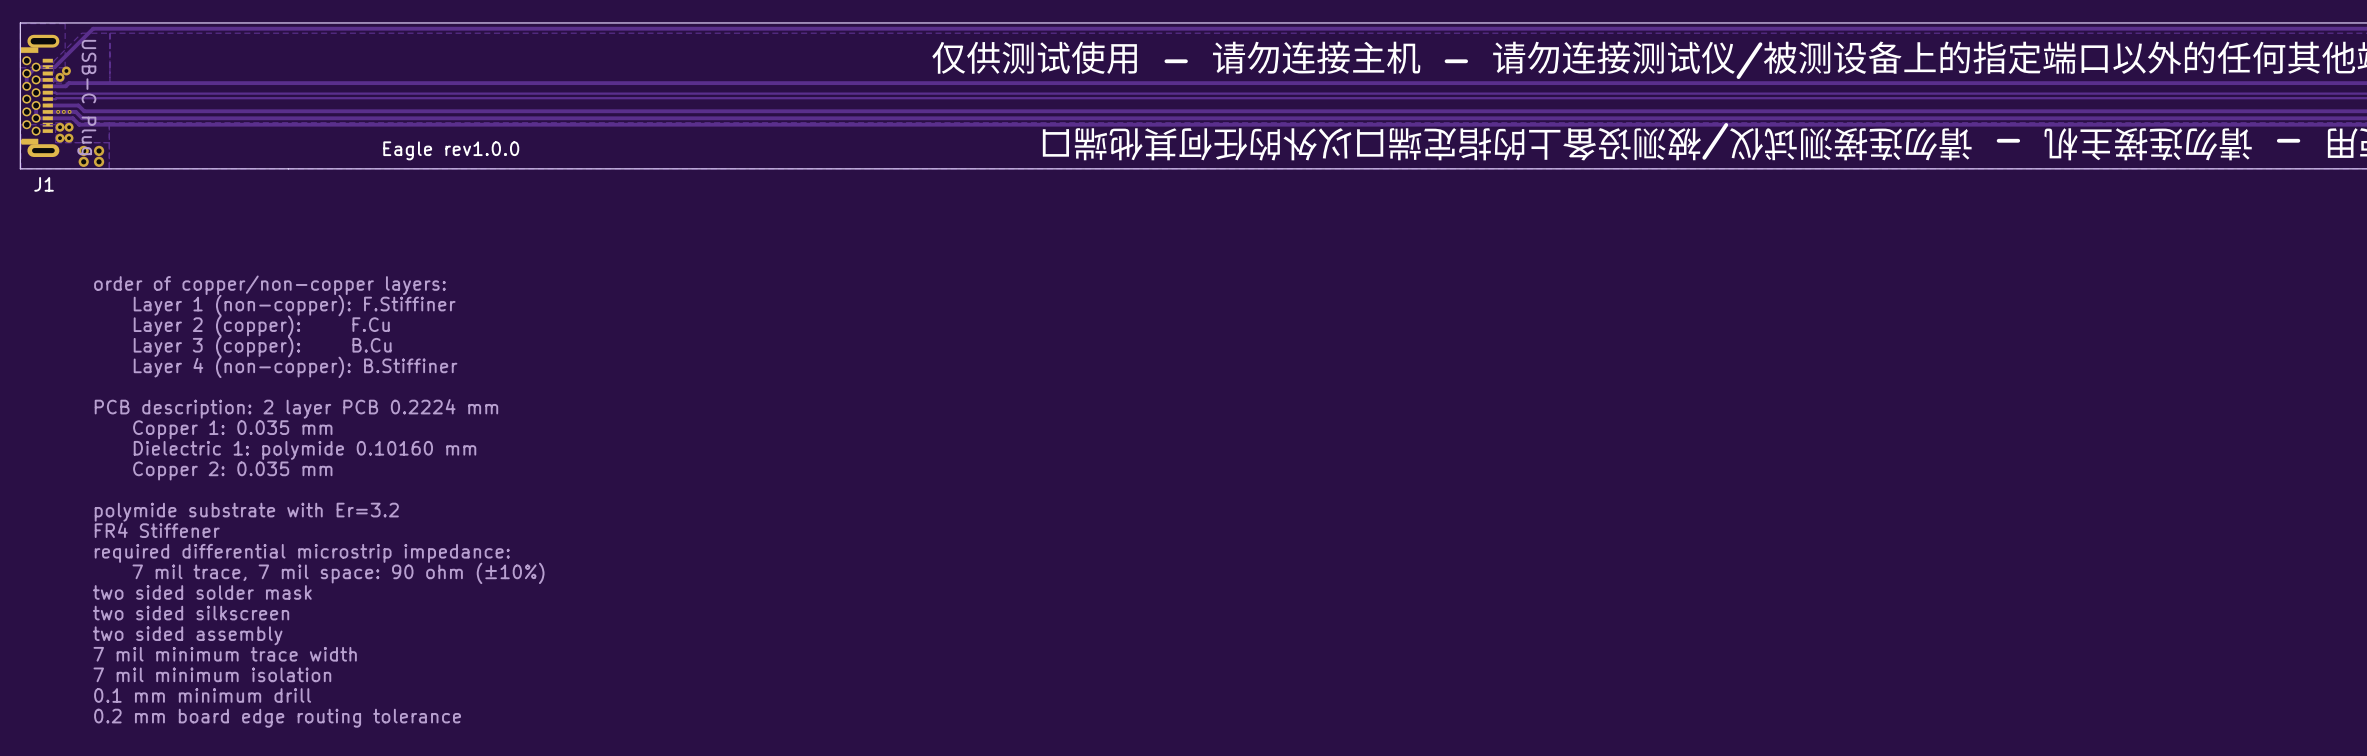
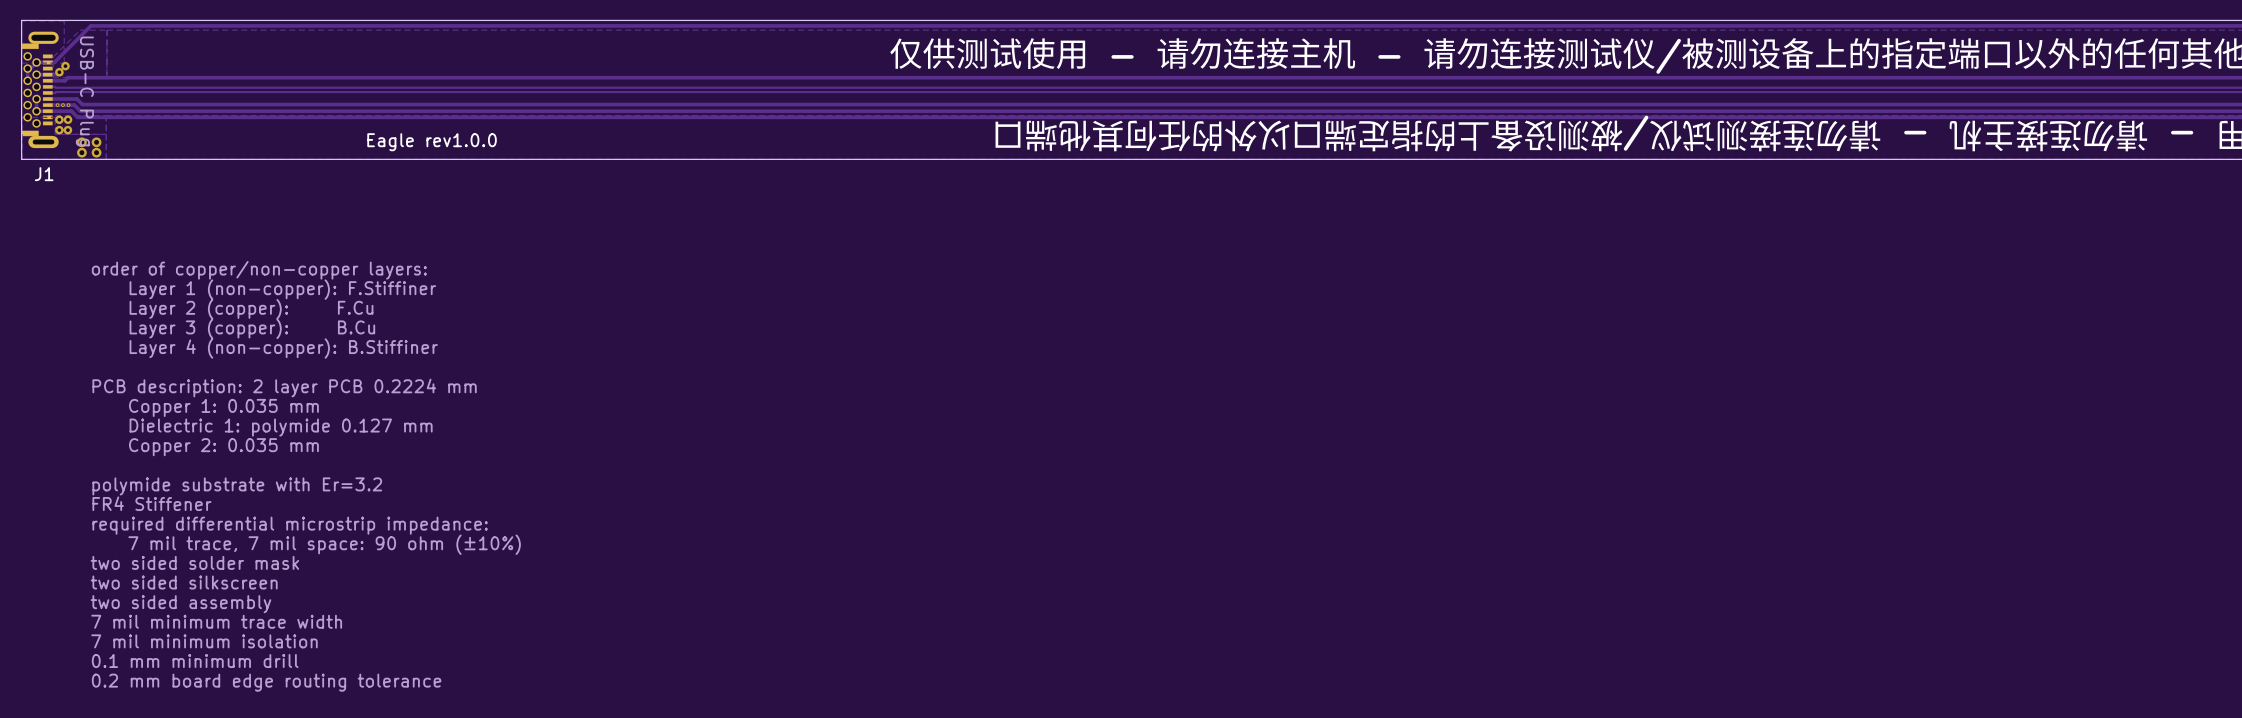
text: Dielectric 1: polymide 0.10160 mm (304, 450) -> Dielectric 1: polymide 0.127 mm (281, 427)

